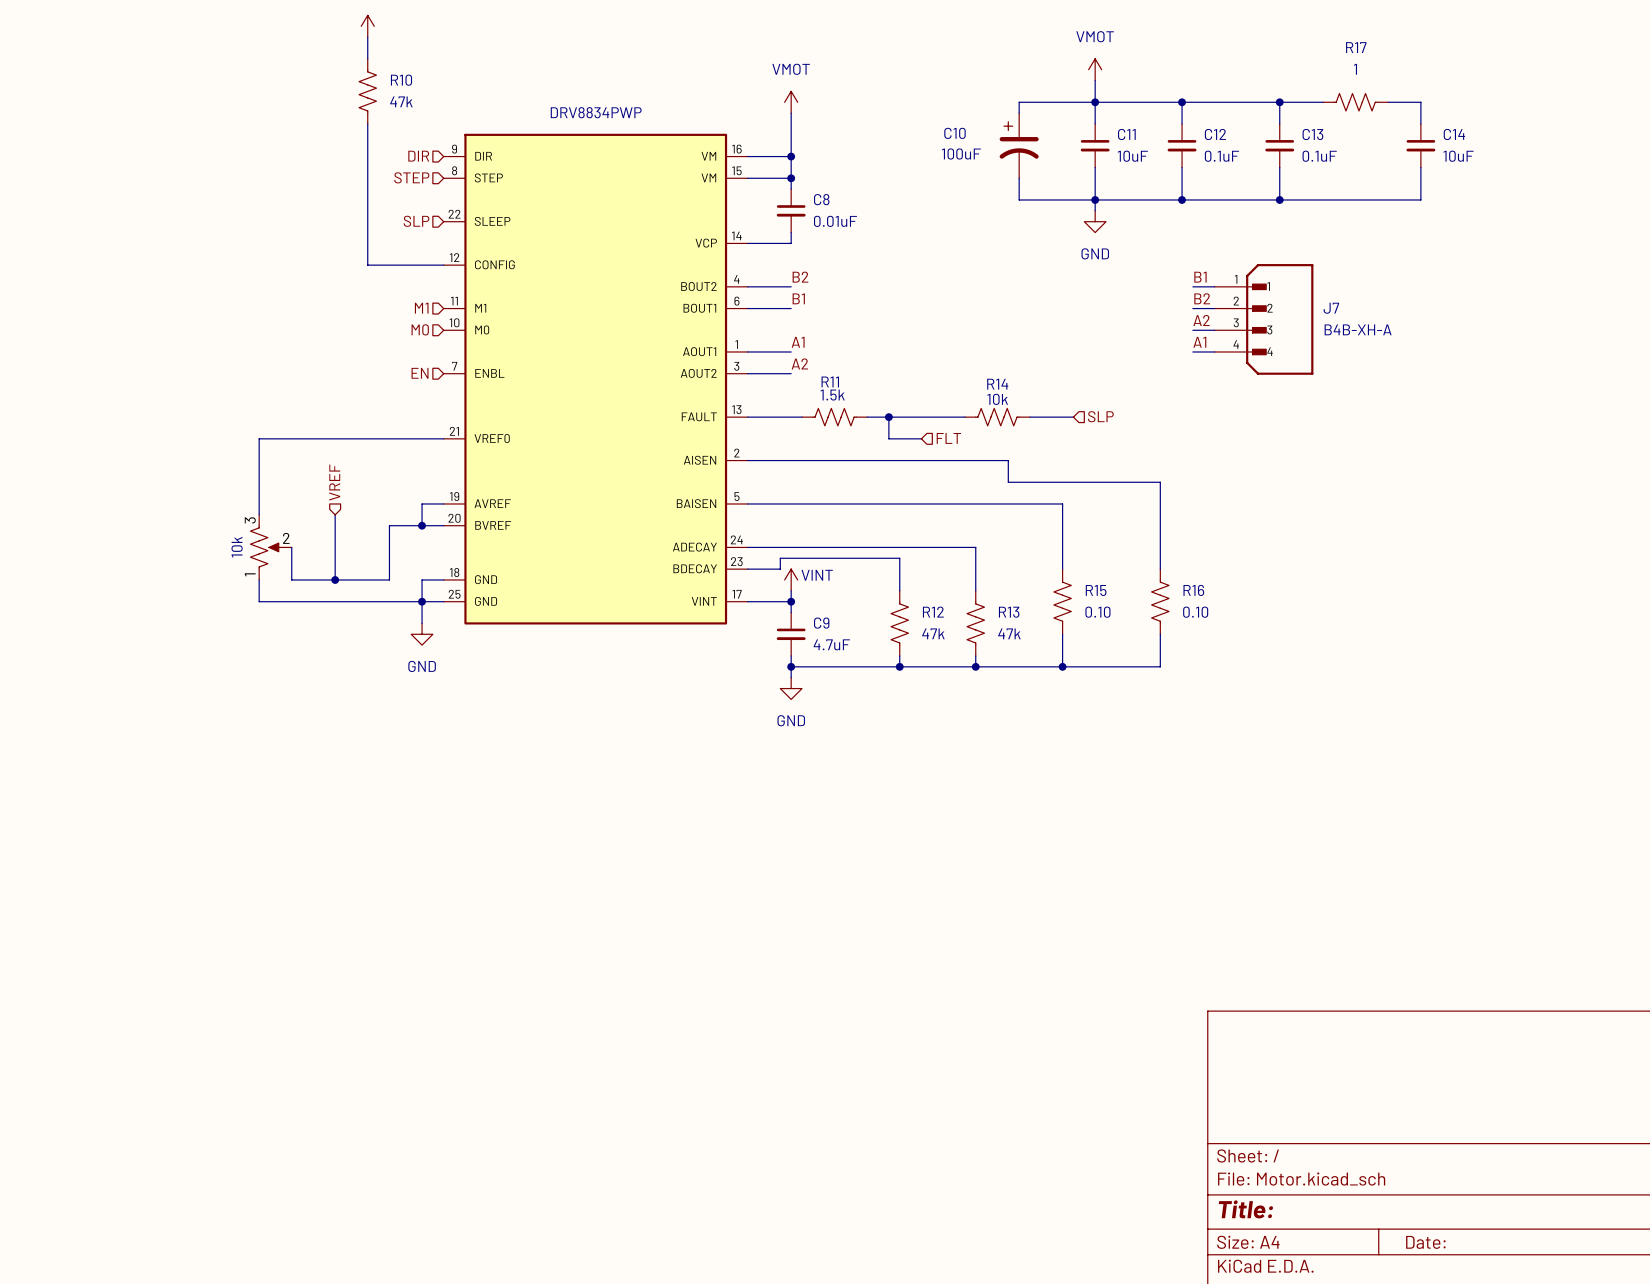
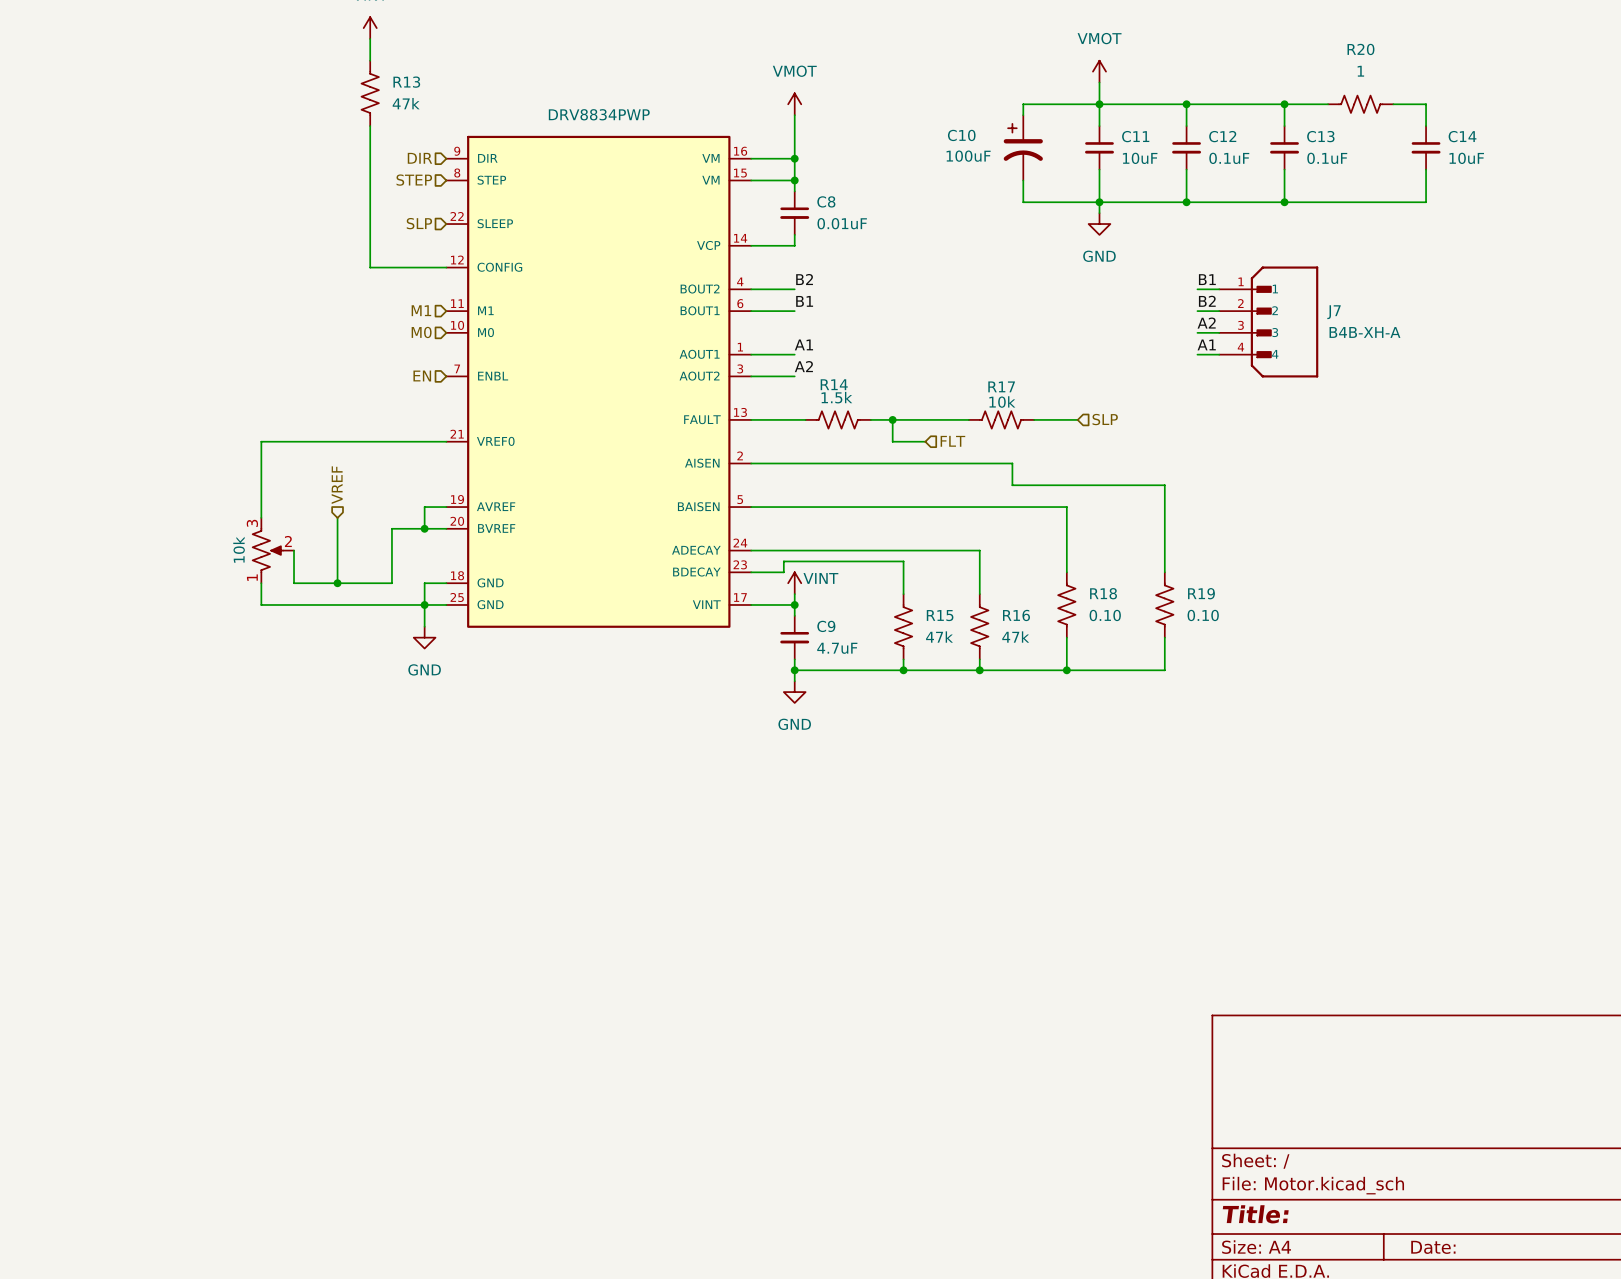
R17 name: R17 (1356, 47) -> R20 (1360, 49)
R10 name: R10 (401, 80) -> R13 (406, 82)
R11 name: R11 (830, 381) -> R14 (834, 384)
R14 name: R14 (997, 384) -> R17 (1001, 386)
R15 name: R15 (1096, 590) -> R18 (1103, 593)
R16 name: R16 (1193, 590) -> R19 (1201, 593)
R12 name: R12 (933, 612) -> R15 (940, 615)
R13 name: R13 (1009, 612) -> R16 (1016, 615)

